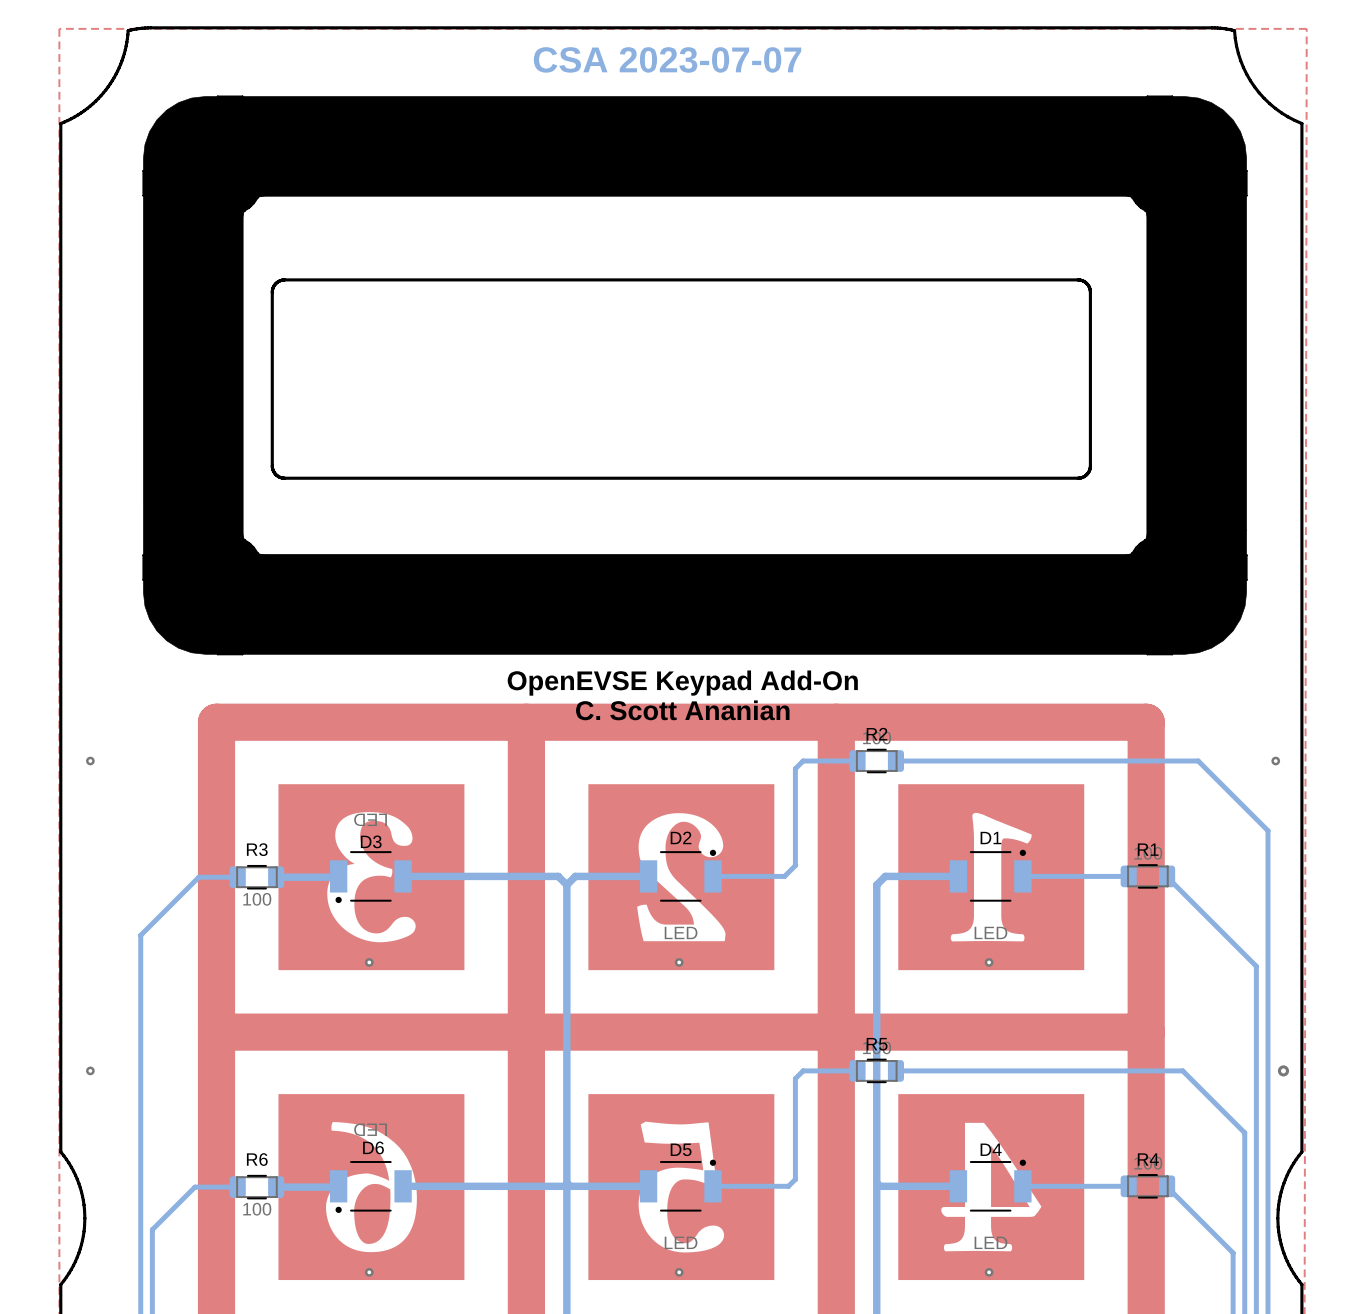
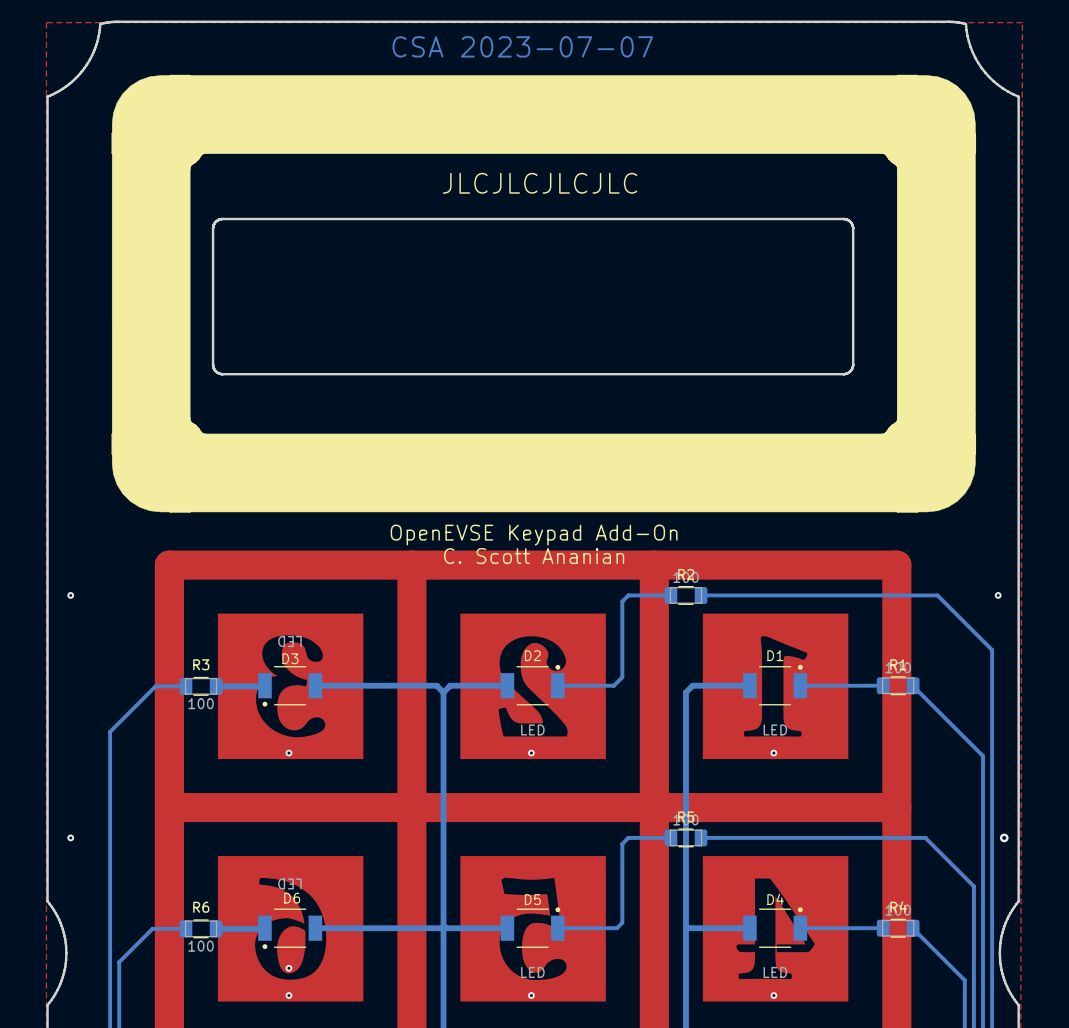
text: none -> JLCJLCJLCJLC (540, 183)
top track: none -> (776, 944) (776, 953)
via: none -> (288, 968)

